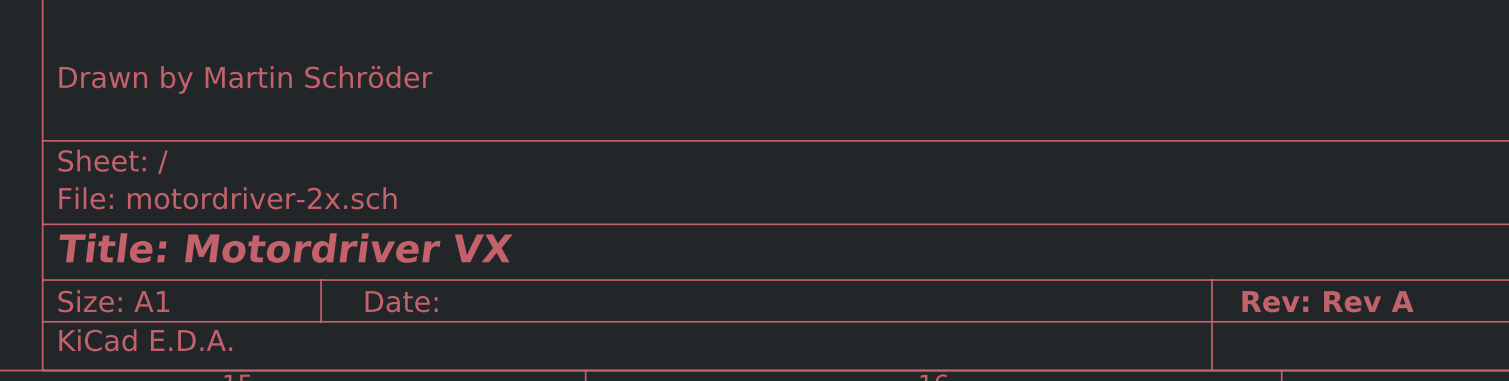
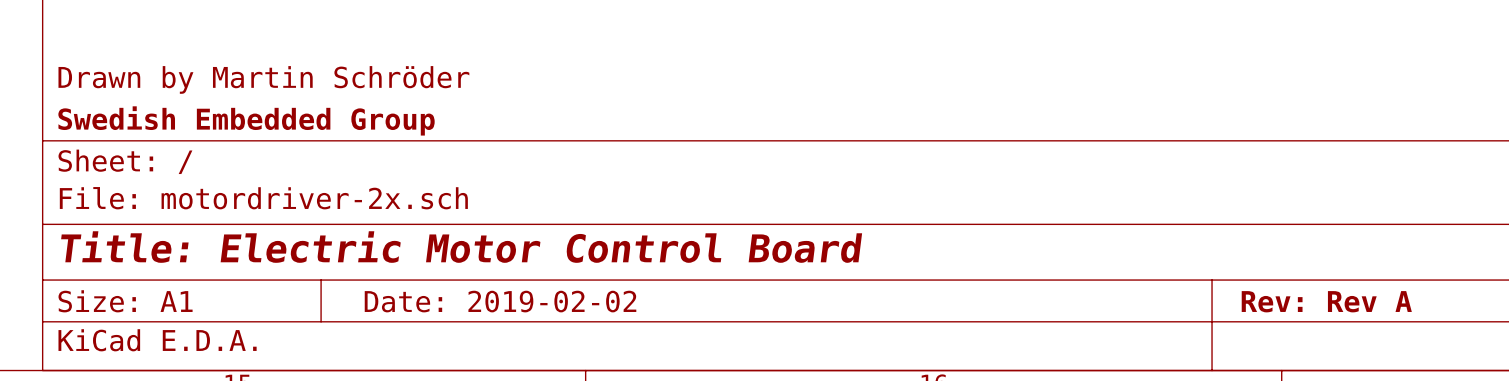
title block: none -> Swedish Embedded Group (246, 120)
title block: Title: Motordriver VX (286, 248) -> Title: Electric Motor Control Board (461, 247)
title block: Date: (401, 301) -> Date: 2019-02-02 (500, 301)

